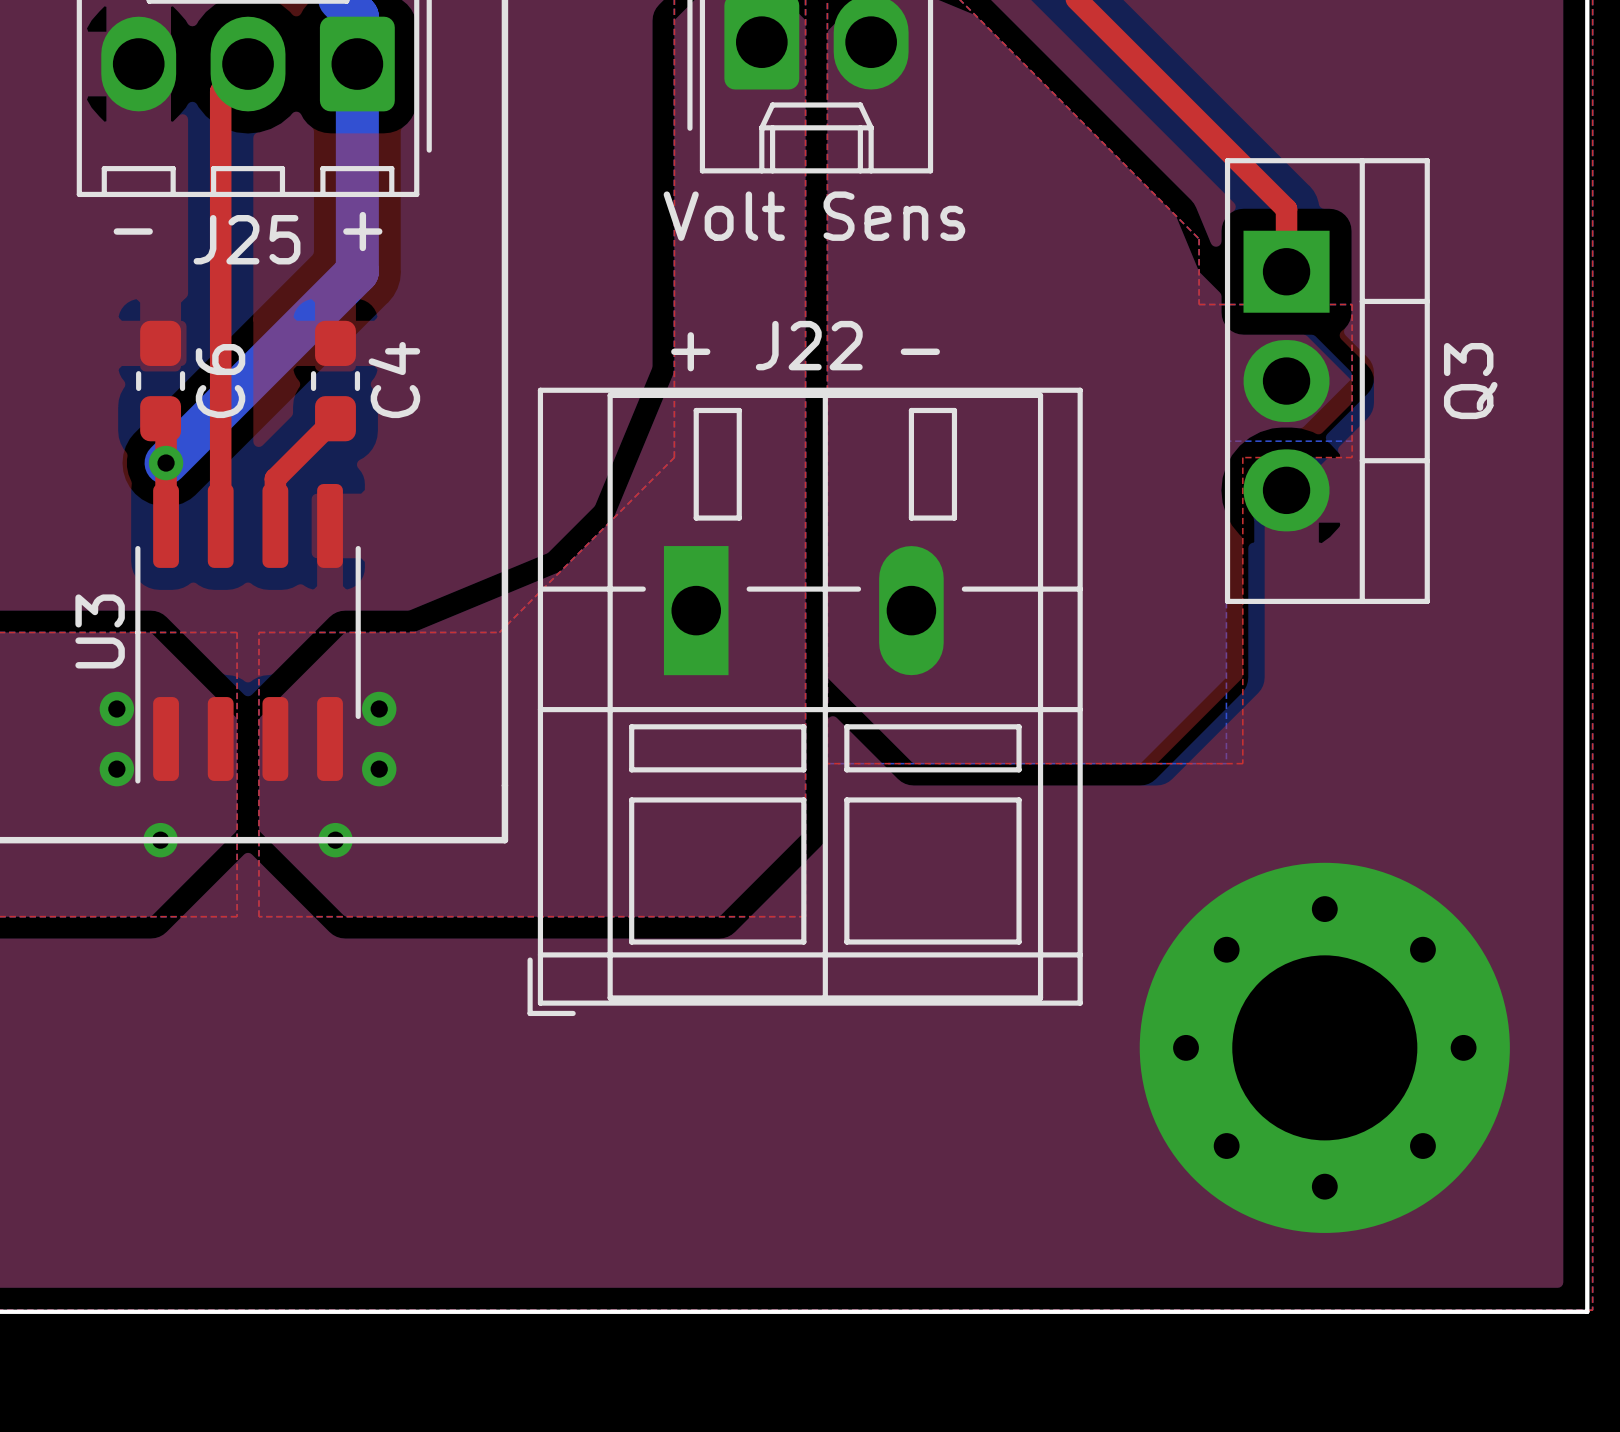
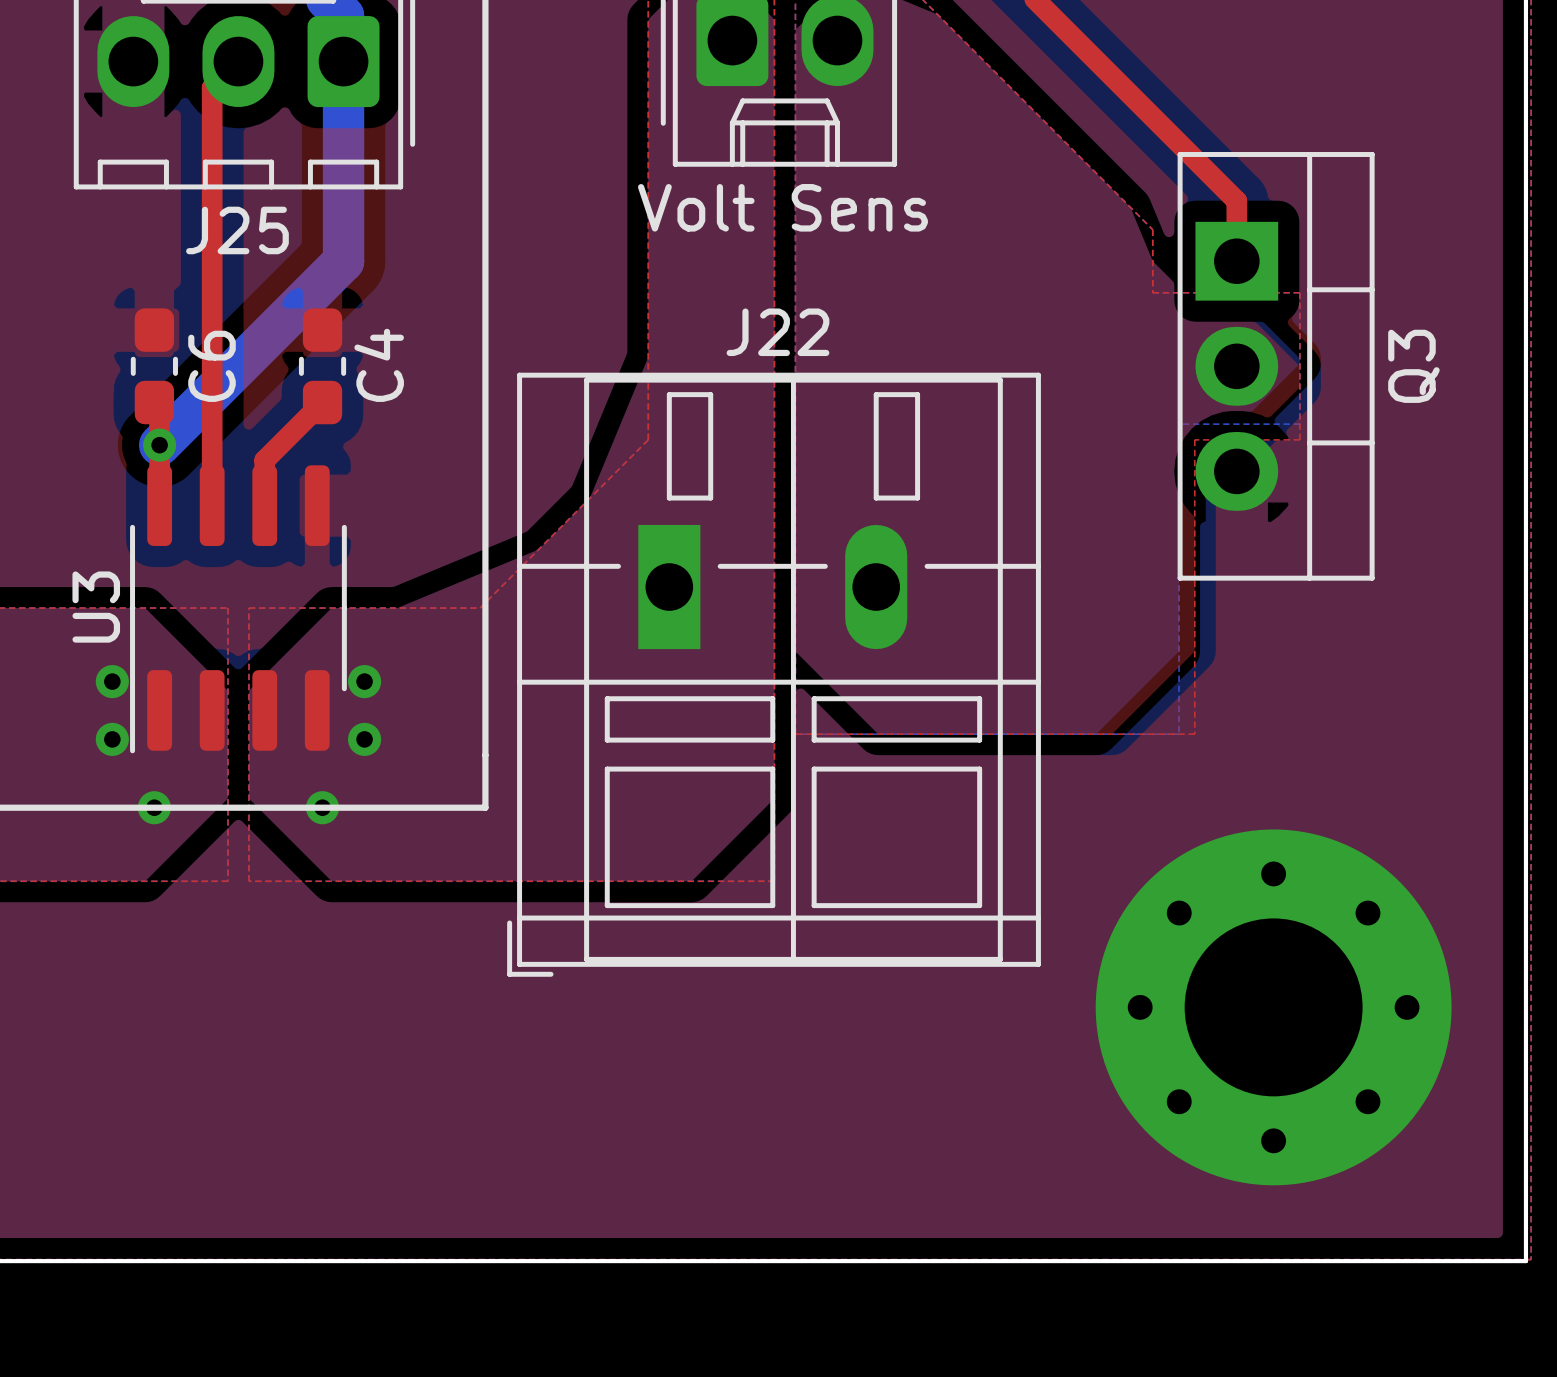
text: - (133, 231) -> none
text: + (362, 231) -> none
text: + (690, 351) -> none
text: - (920, 351) -> none

